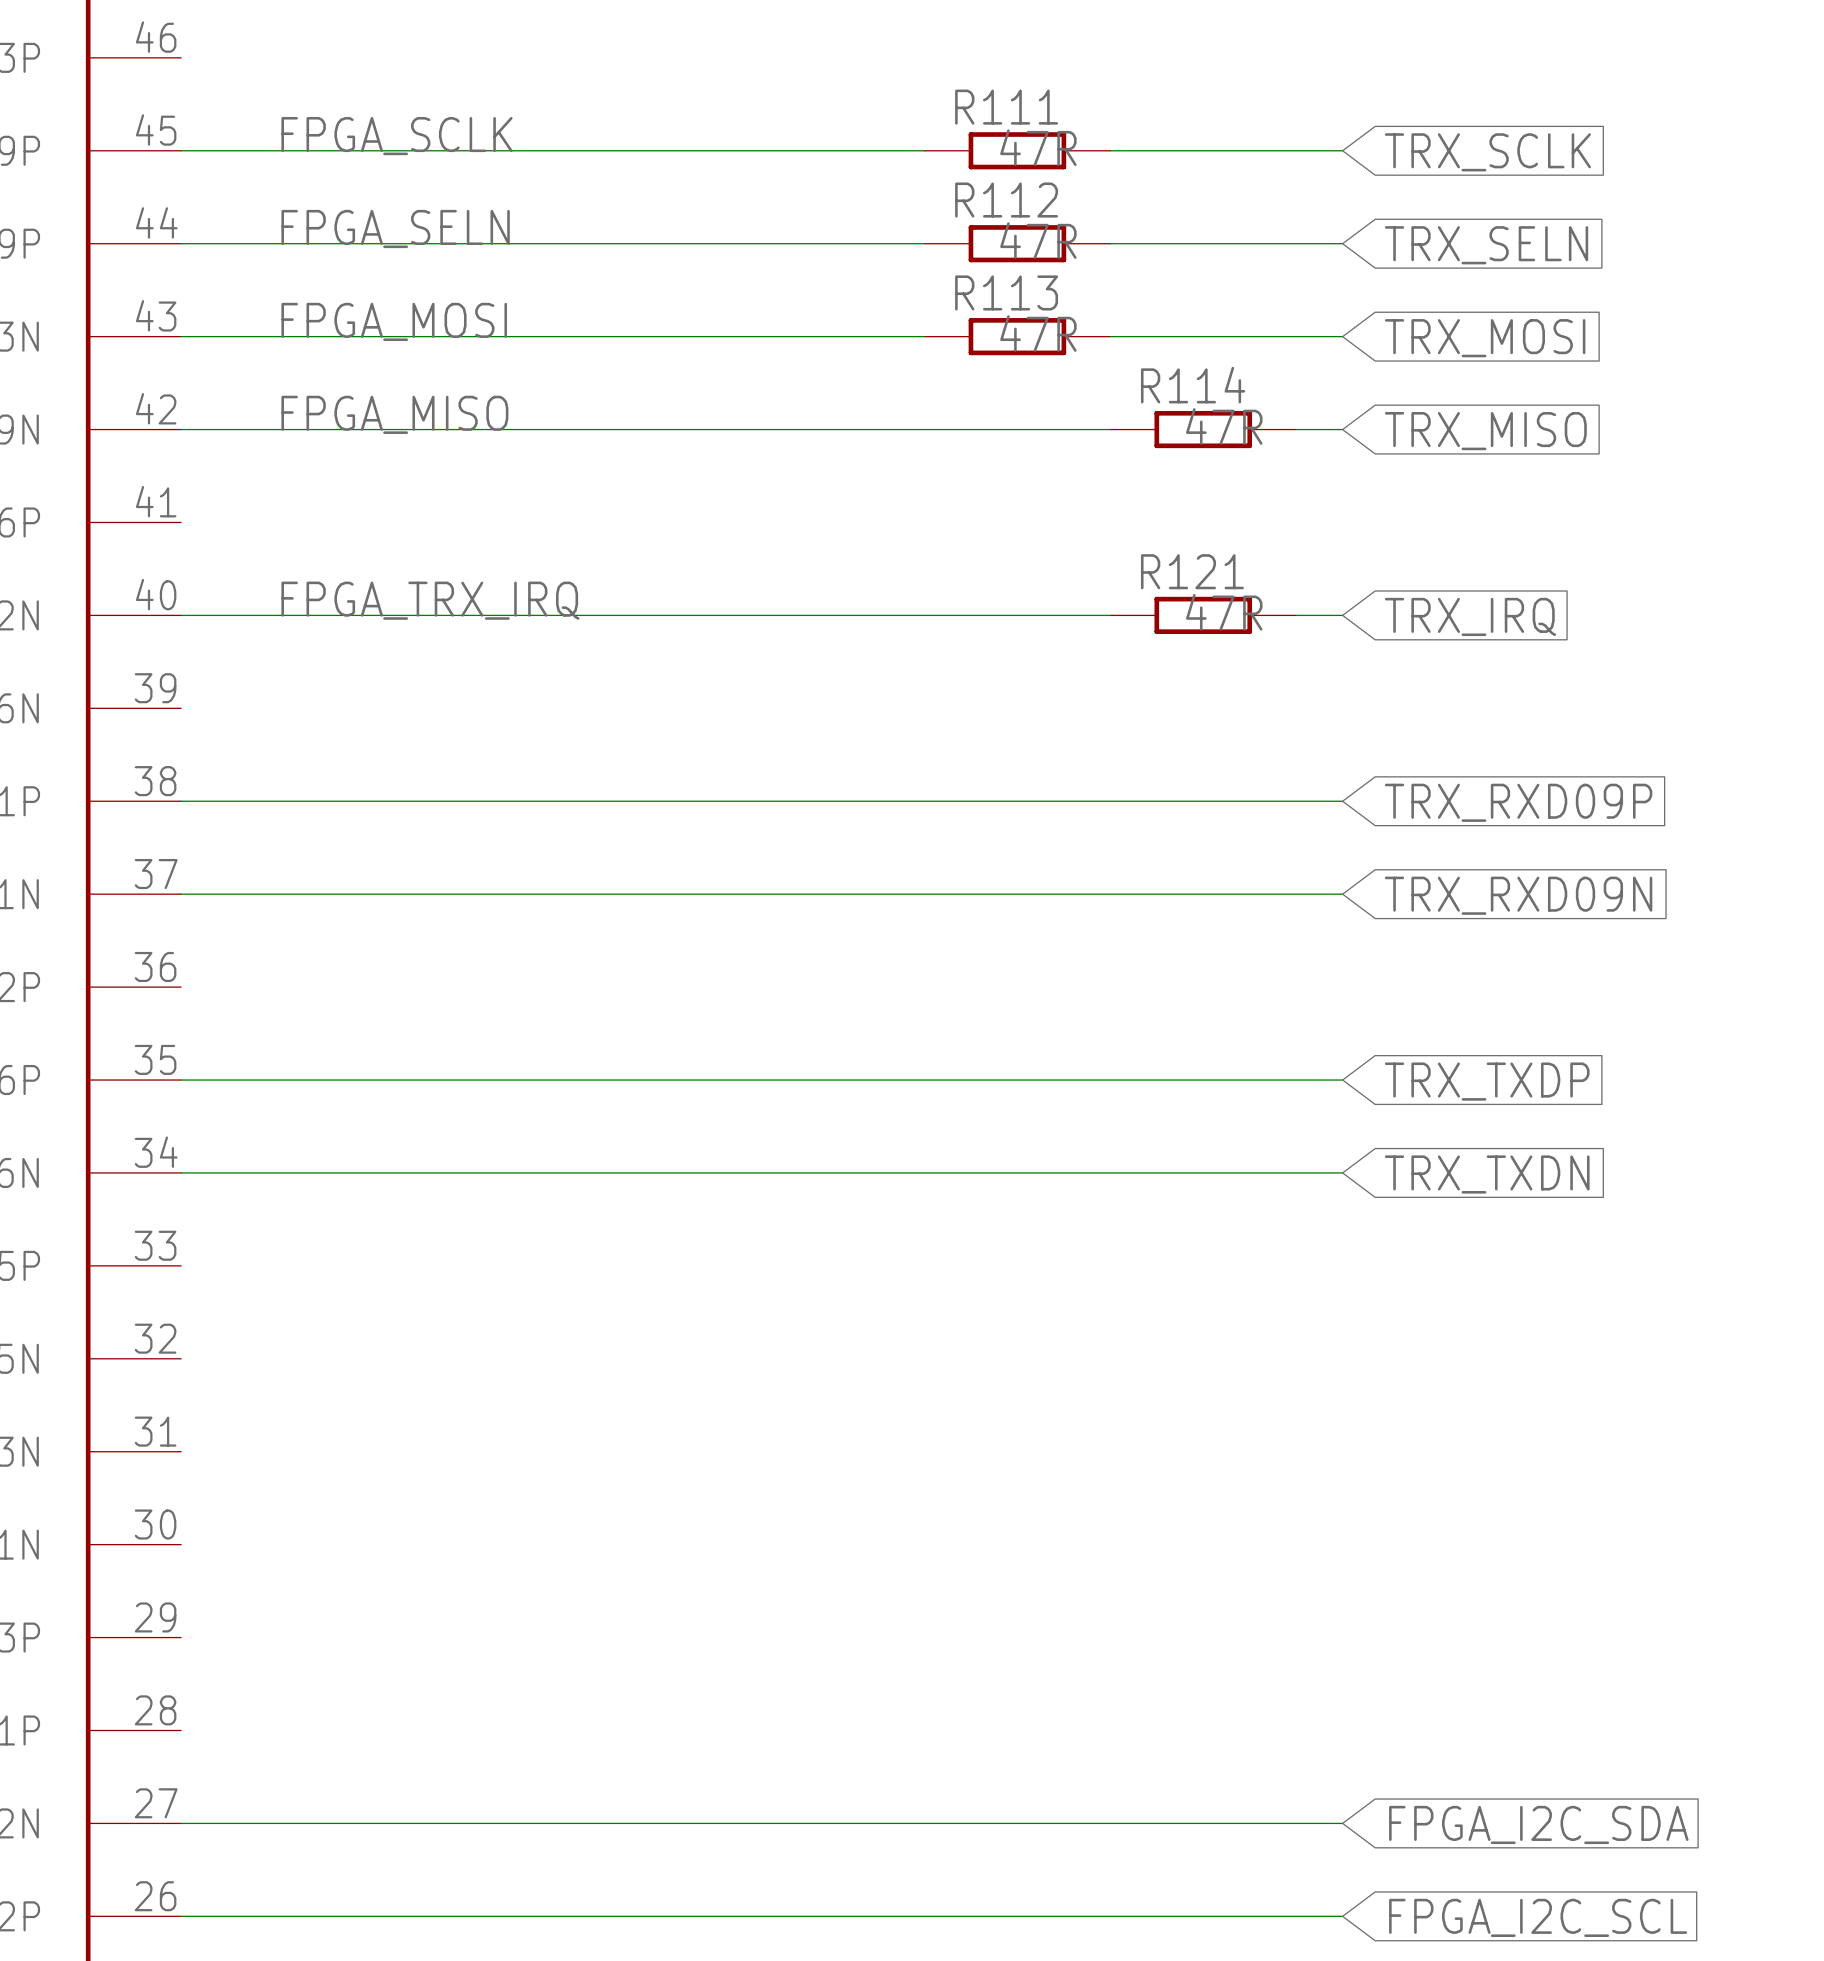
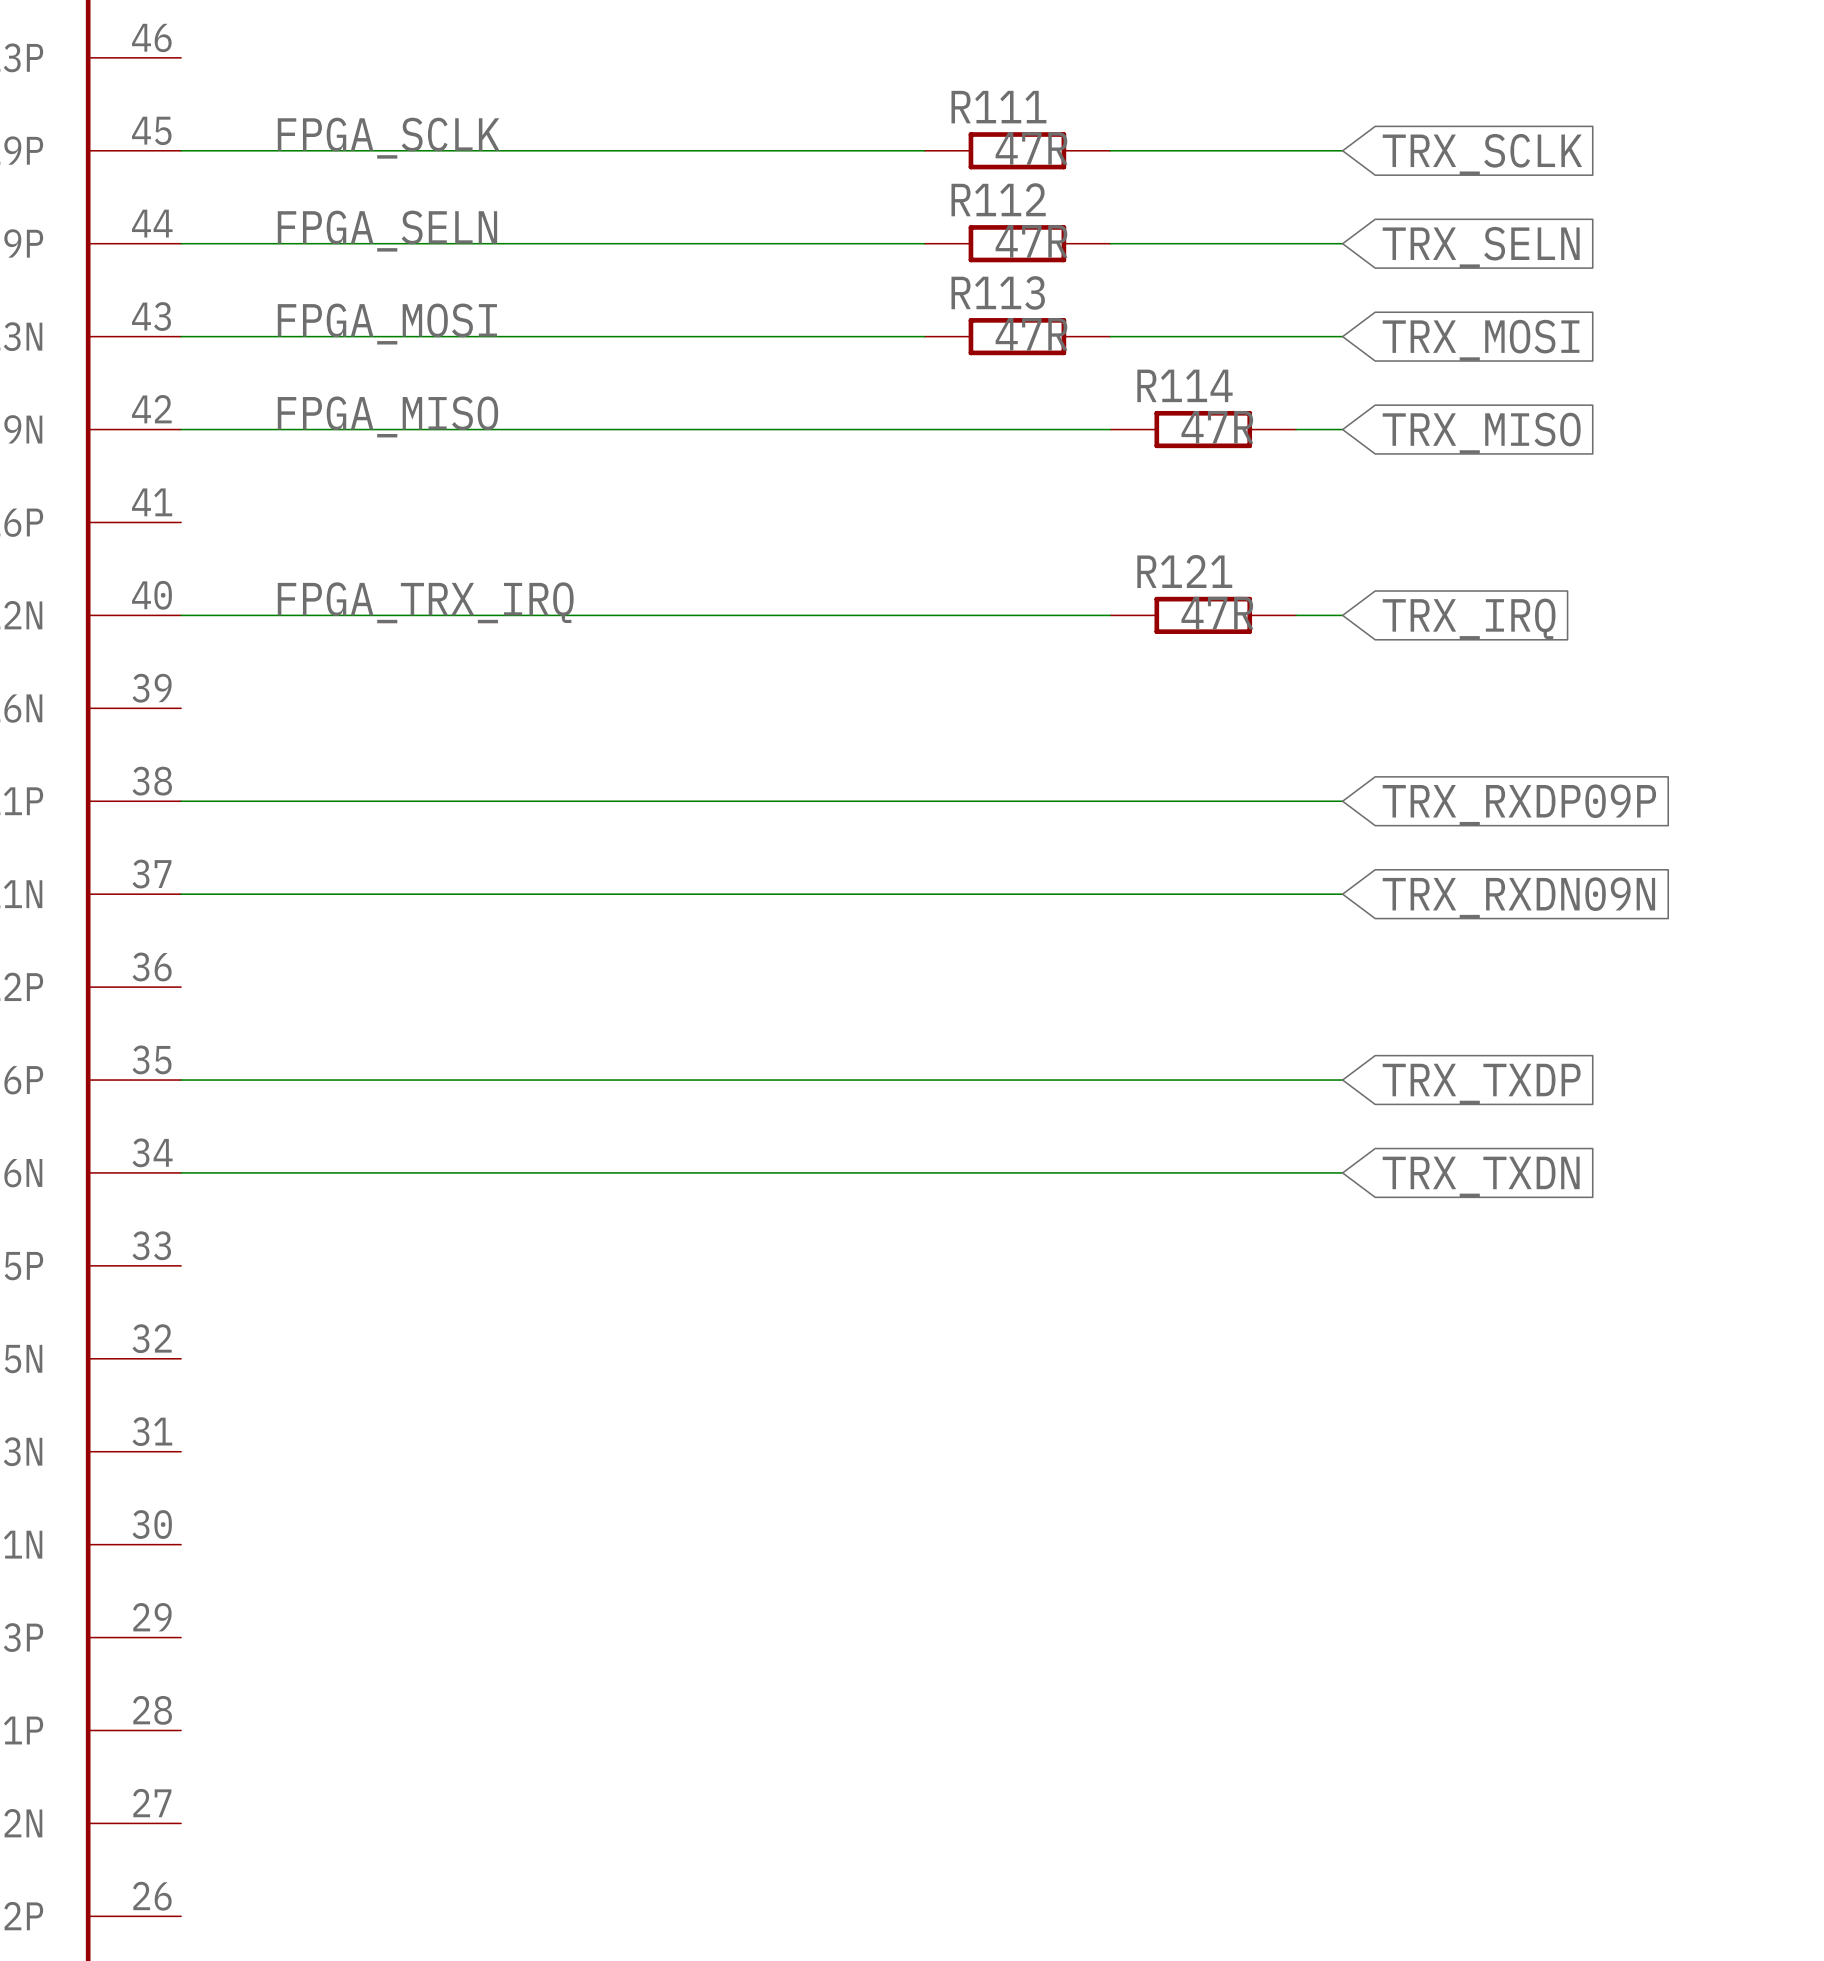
global label: TRX_RXD09P (1518, 802) -> TRX_RXDP09P (1519, 804)
global label: TRX_RXD09N (1518, 895) -> TRX_RXDN09N (1518, 897)
wire: (181, 1823) (1342, 1823) -> none
global label: FPGA_I2C_SDA (1538, 1824) -> none
wire: (181, 1916) (1342, 1916) -> none
global label: FPGA_I2C_SCL (1538, 1917) -> none

